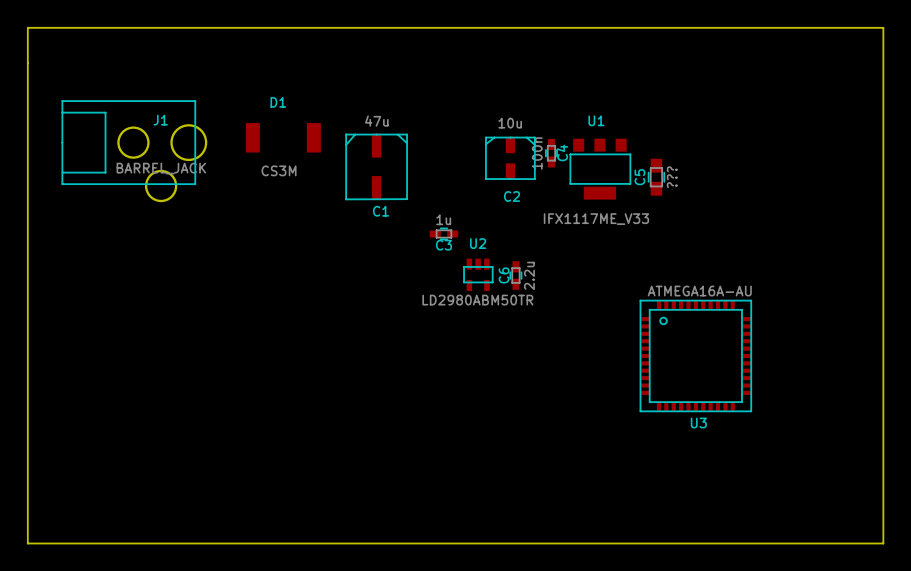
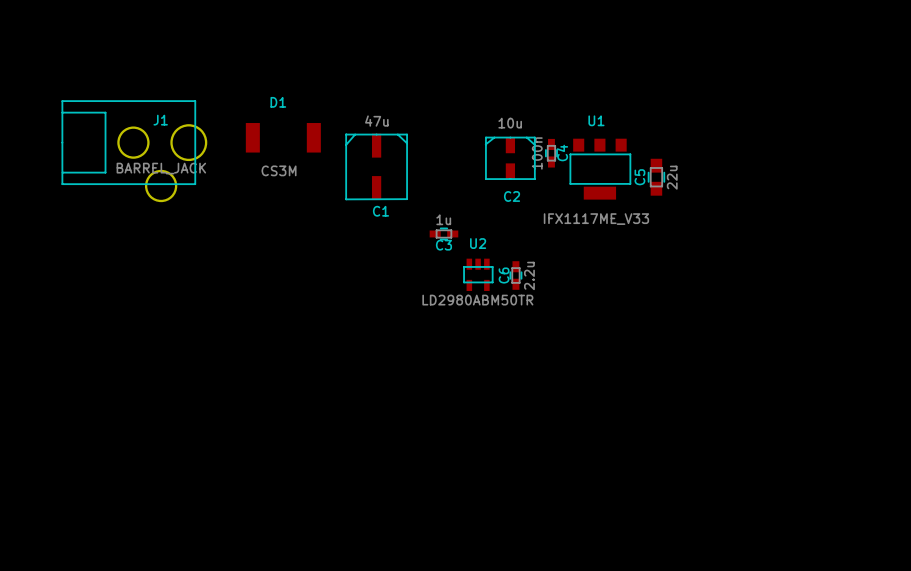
board edge: (27, 27) (27, 543) (883, 543) (883, 27) (27, 27) -> none
C5 value: ??? (672, 177) -> 22u (672, 177)
U3: ATMEGA16A-AU (695, 355) -> none

